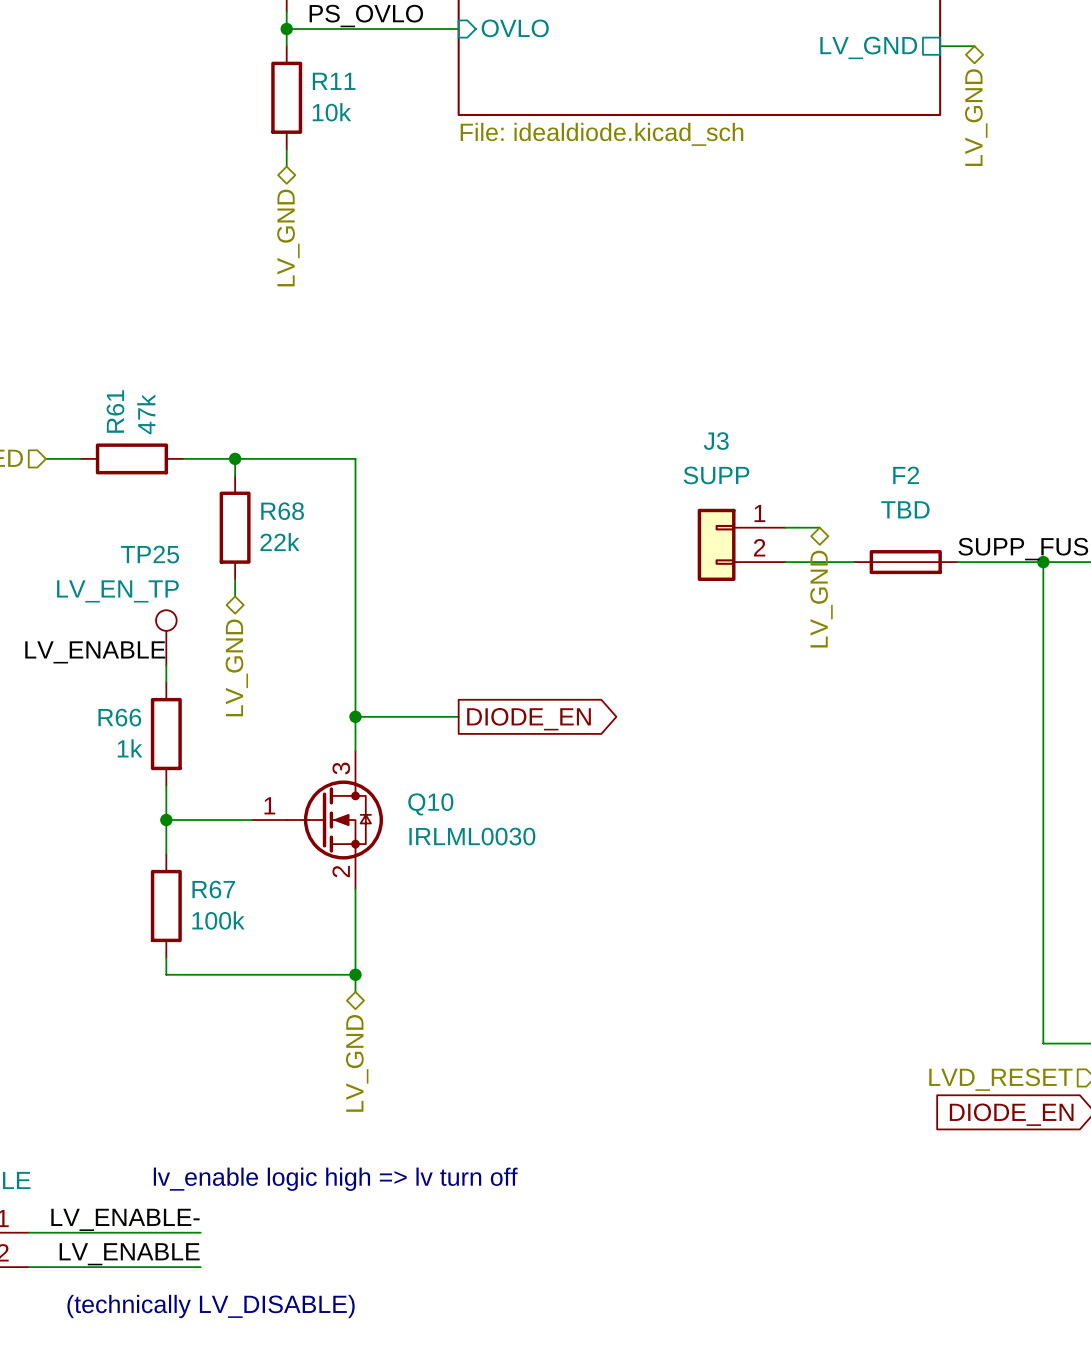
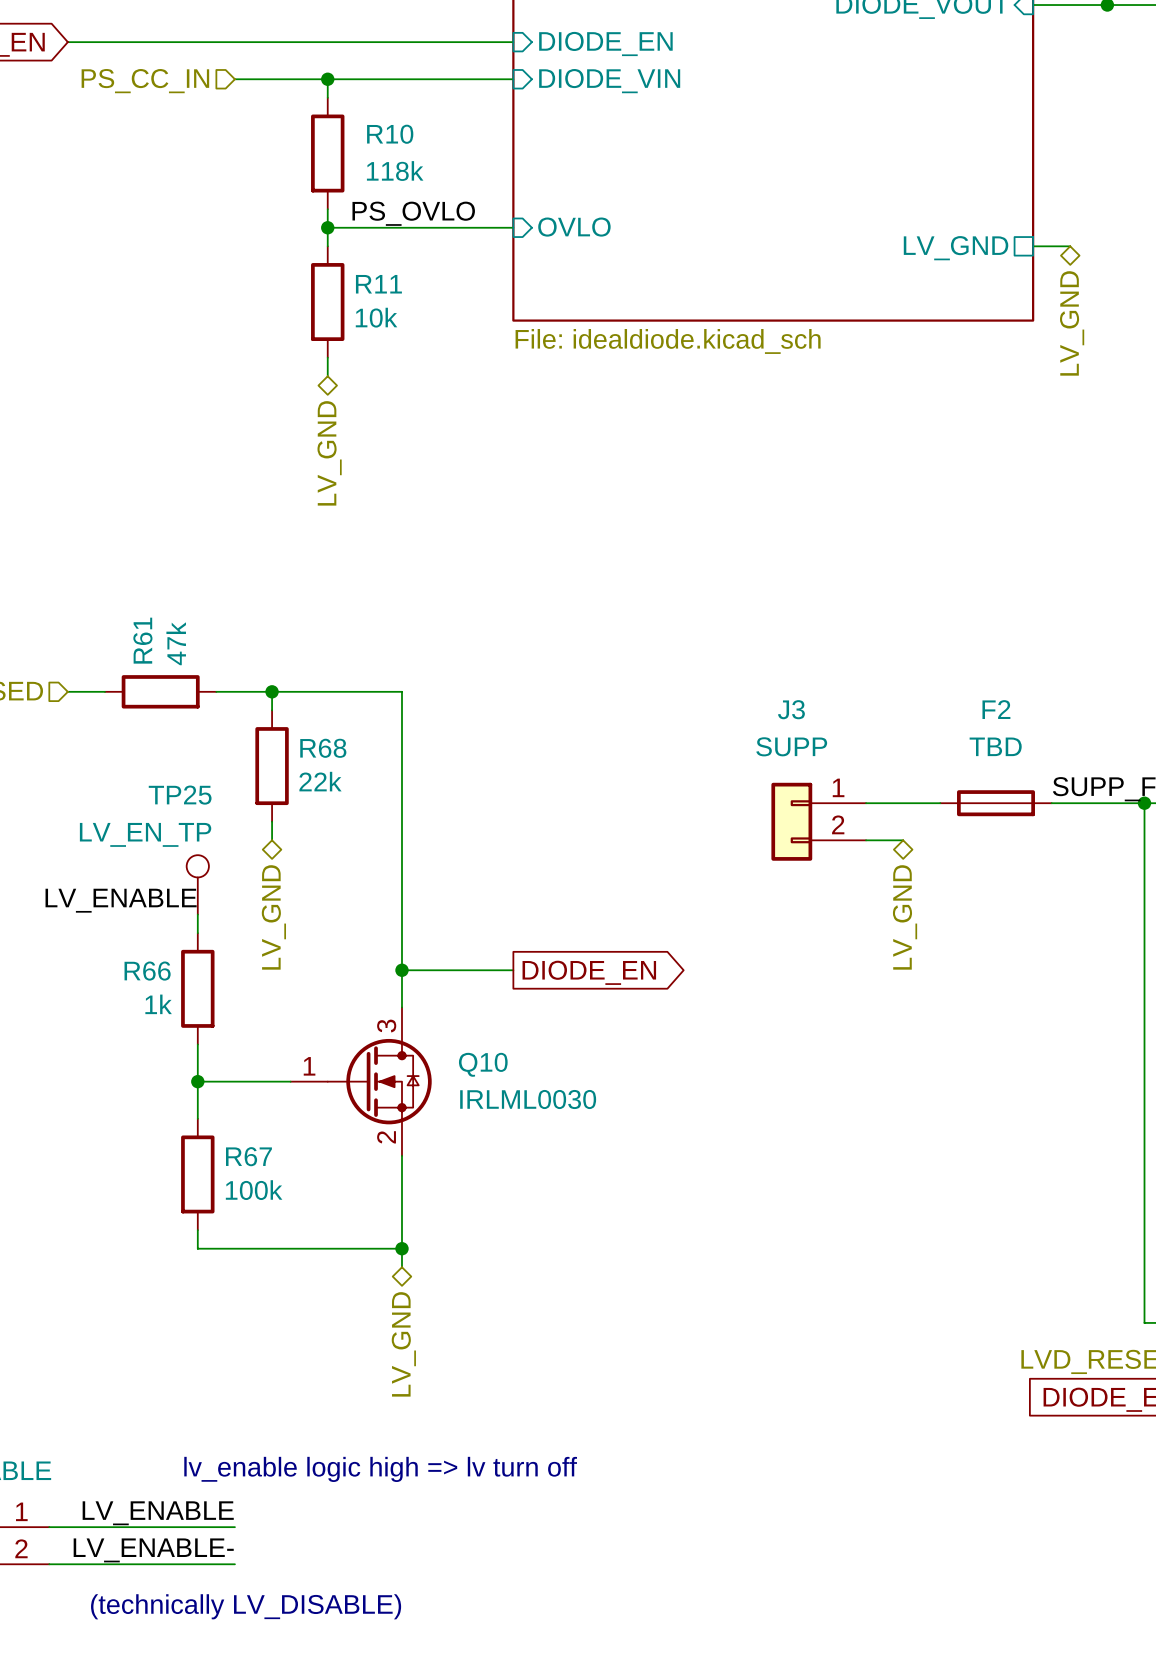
wire: (785, 527) (819, 527) -> (866, 840) (903, 840)
J3 position: (741, 544) -> (818, 821)
hierarchical label position: LV_GND (821, 599) -> LV_GND (905, 917)
label: LV_ENABLE- (125, 1219) -> LV_ENABLE (158, 1513)
label: LV_ENABLE (129, 1254) -> LV_ENABLE- (153, 1550)

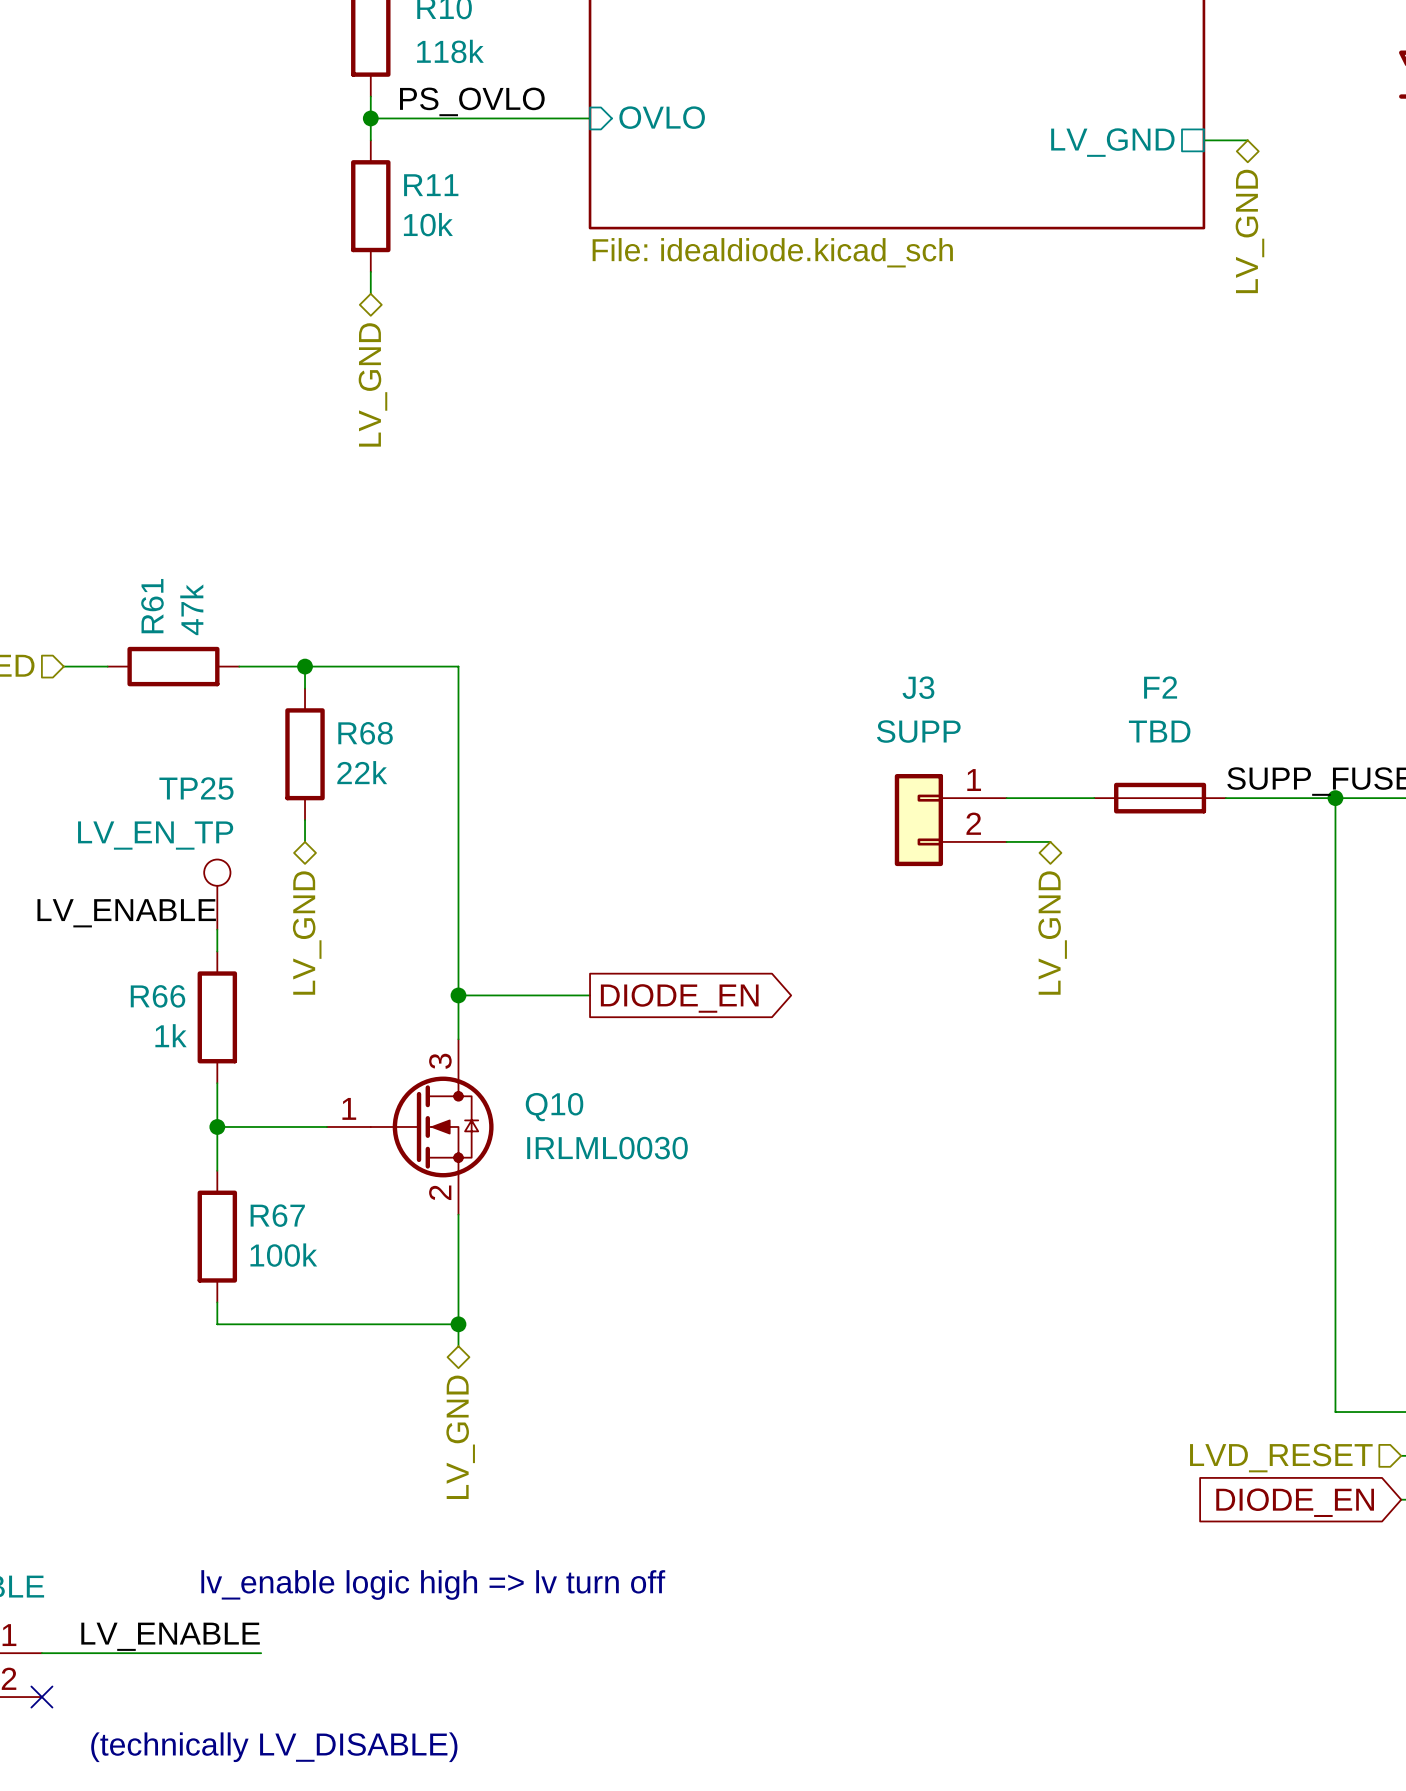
label: LV_ENABLE- (153, 1550) -> none
wire: (49, 1564) (234, 1564) -> none
no-connect mark: none -> (41, 1697)

